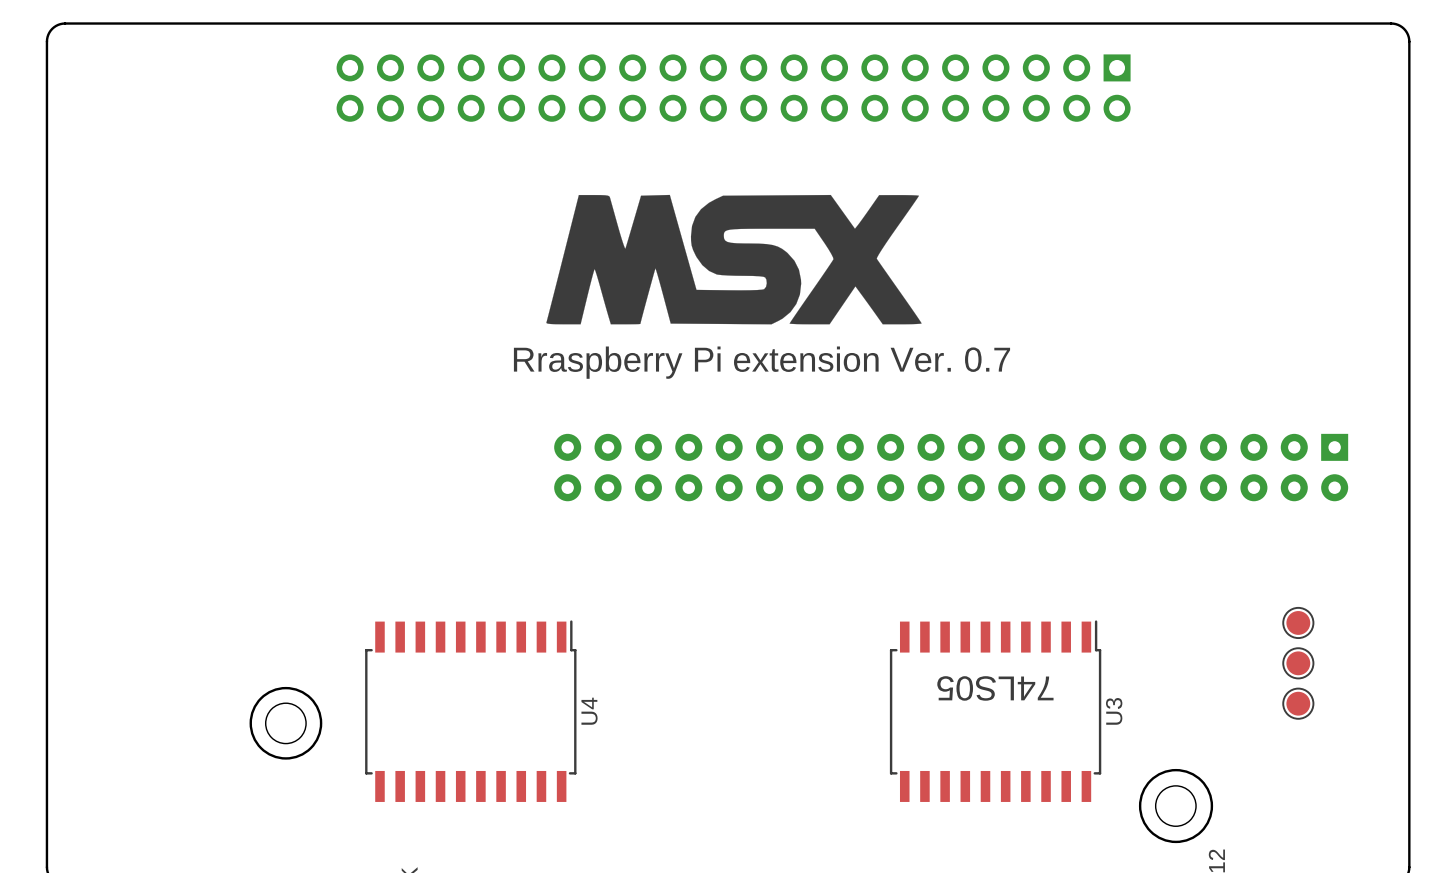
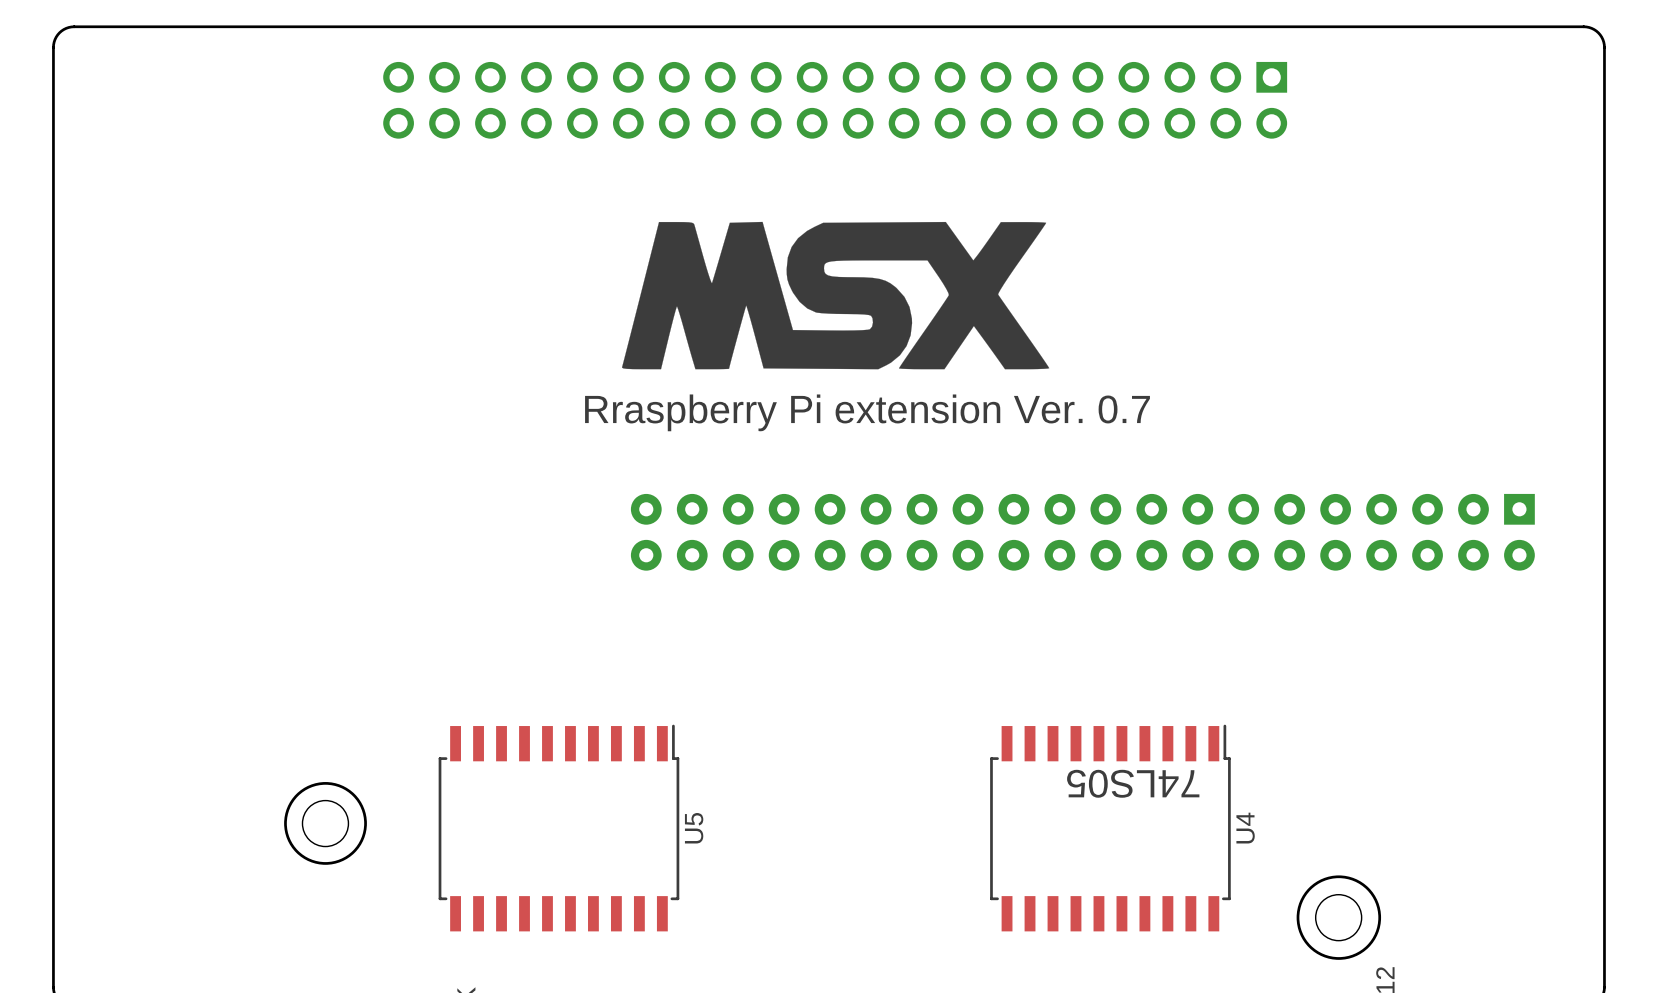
part: (1298, 622) -> none
part: (1298, 663) -> none
part: (1298, 703) -> none
U4 position: (470, 711) -> (1110, 828)
U3: (995, 711) -> none
U5: none -> (558, 828)

